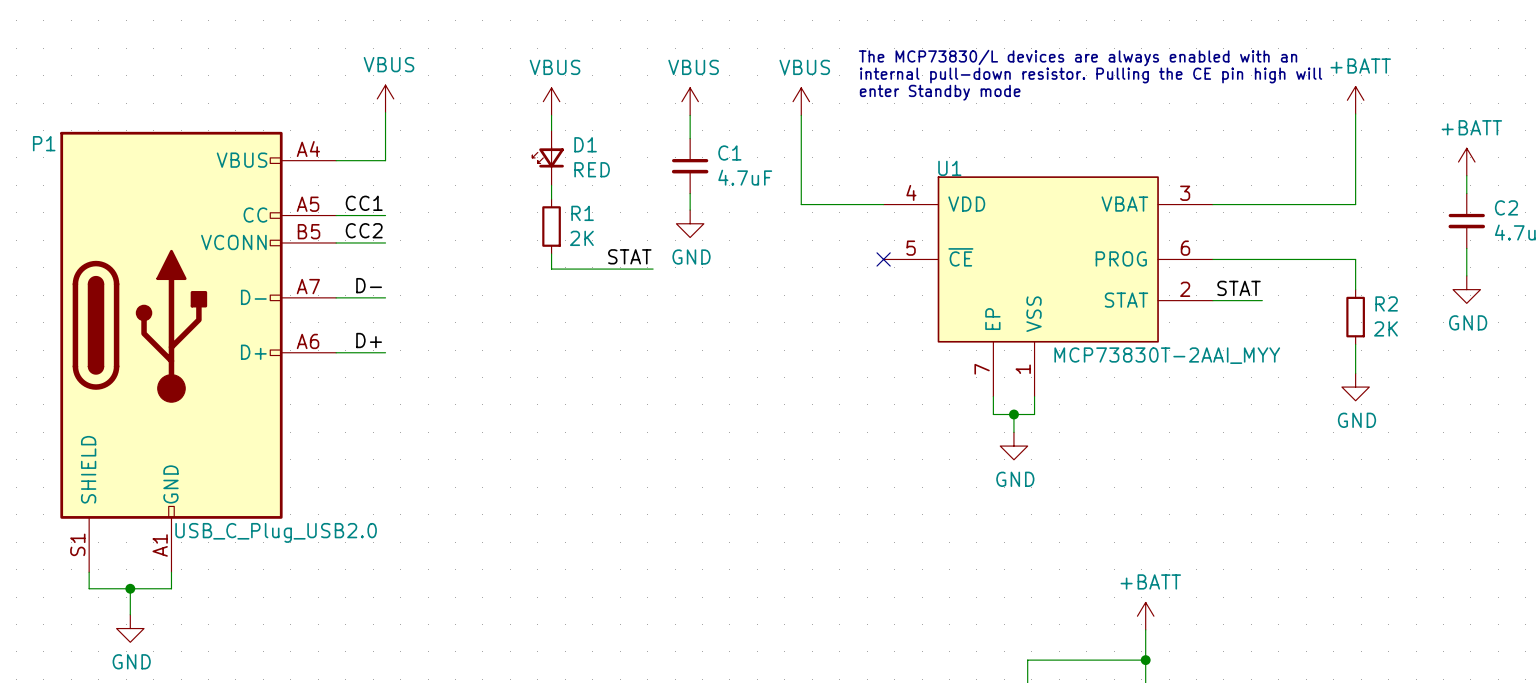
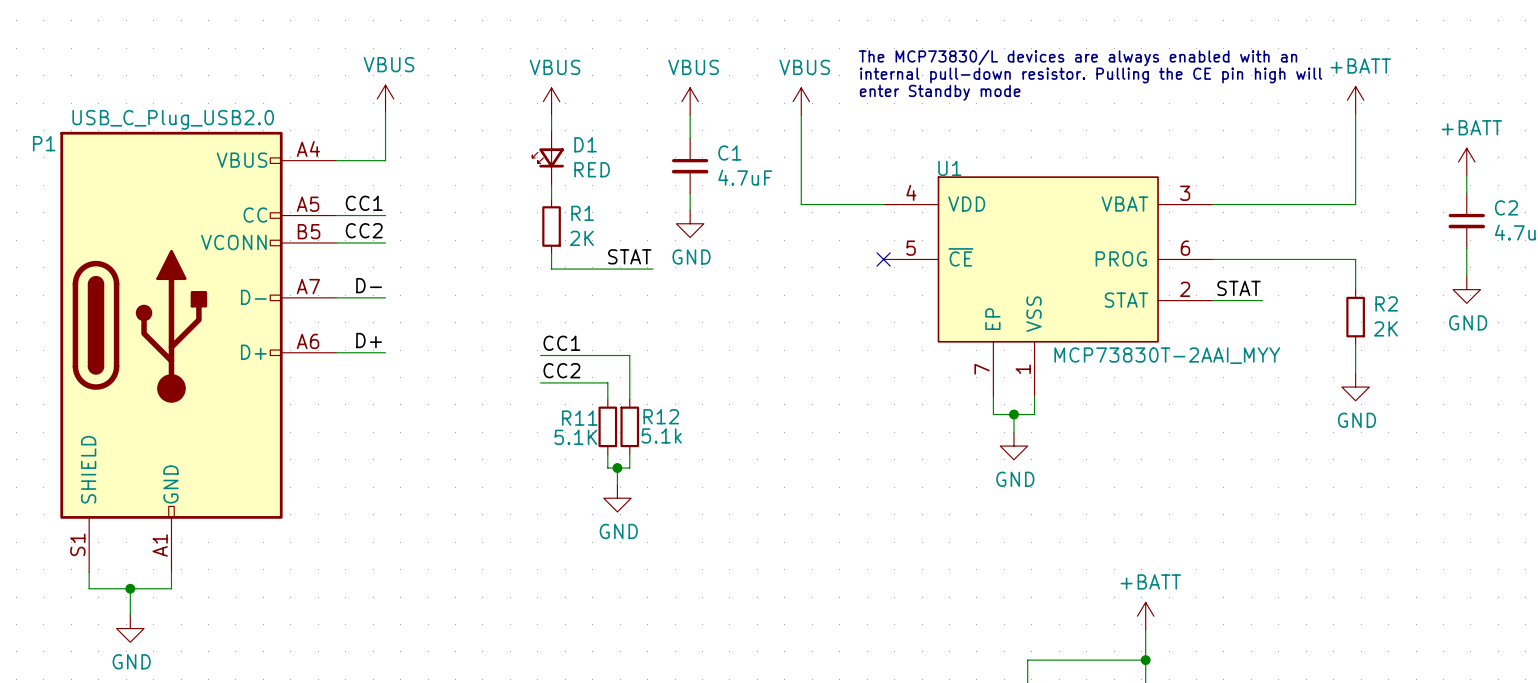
label: none -> CC1 (561, 343)
wire: none -> (540, 355) (629, 355) (629, 399)
label: none -> CC2 (561, 370)
wire: none -> (540, 382) (607, 382) (607, 399)
R11: none -> 5.1K (607, 426)
R12: none -> 5.1k (629, 426)
wire: none -> (607, 454) (607, 468) (629, 468) (629, 454)
wire: none -> (617, 468) (617, 484)
junction: none -> (617, 468)
power symbol: none -> GND (617, 498)
P1 value position: USB_C_Plug_USB2.0 (276, 532) -> USB_C_Plug_USB2.0 (173, 119)

